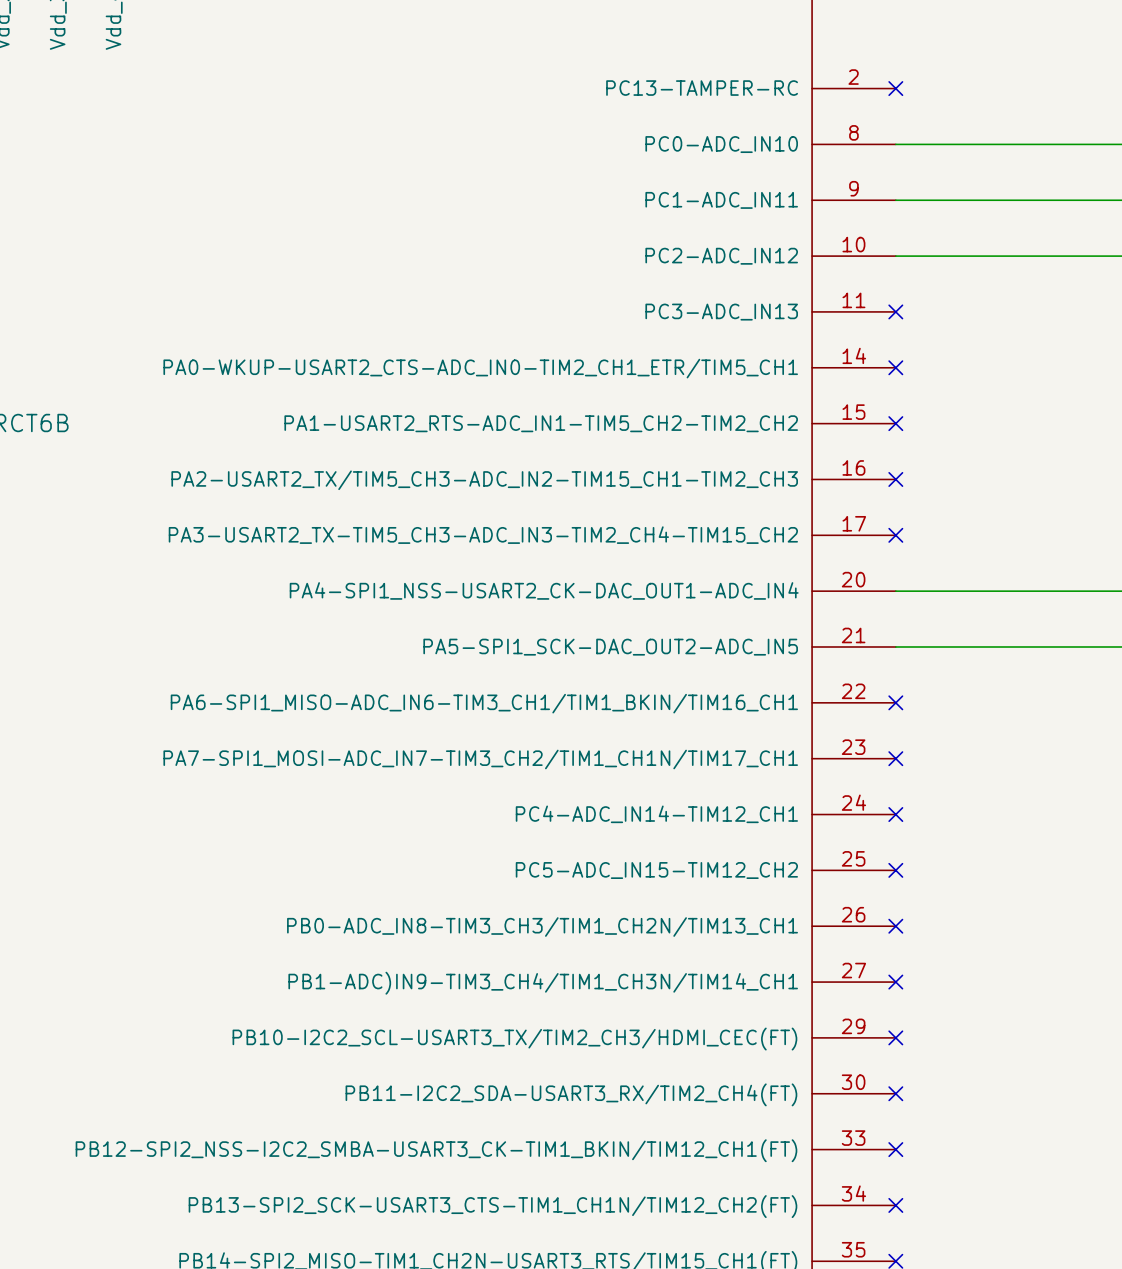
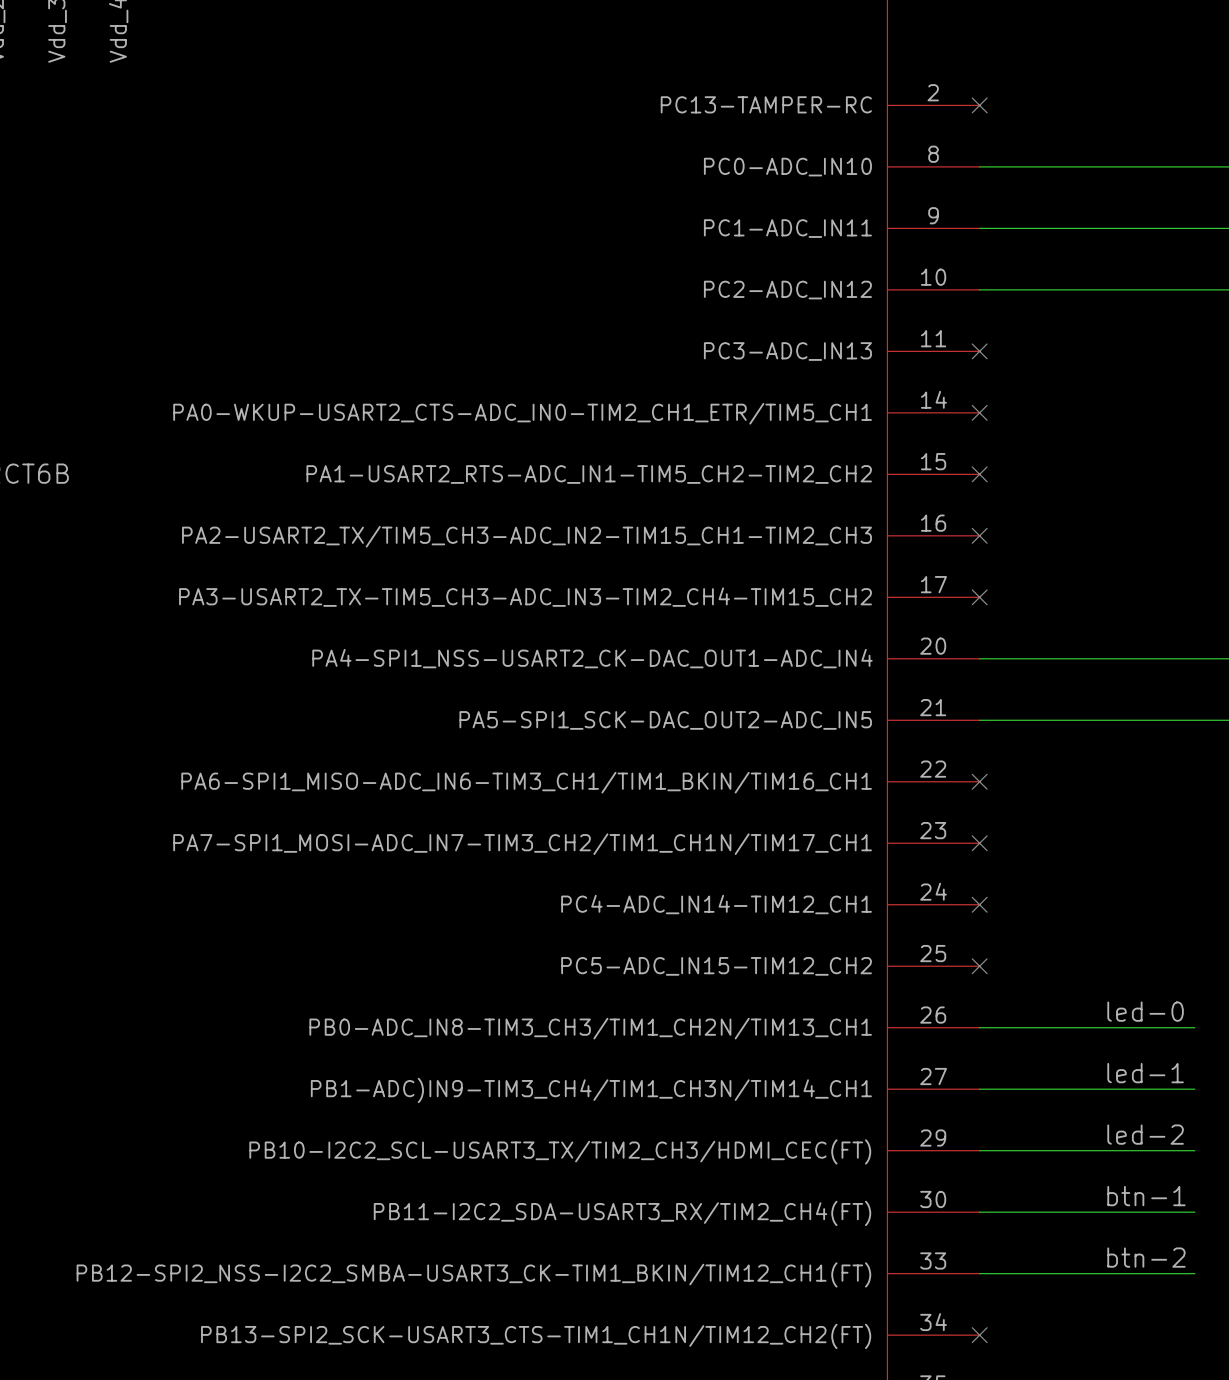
label: none -> led-0 (1145, 1011)
wire: none -> (979, 1027) (1194, 1027)
no-connect mark: (895, 926) -> none
label: none -> led-1 (1145, 1073)
wire: none -> (979, 1089) (1194, 1089)
no-connect mark: (895, 982) -> none
label: none -> led-2 (1145, 1134)
wire: none -> (979, 1150) (1194, 1150)
no-connect mark: (895, 1037) -> none
label: none -> btn-1 (1146, 1196)
wire: none -> (979, 1212) (1194, 1212)
no-connect mark: (895, 1093) -> none
label: none -> btn-2 (1146, 1257)
wire: none -> (979, 1273) (1194, 1273)
no-connect mark: (895, 1149) -> none

